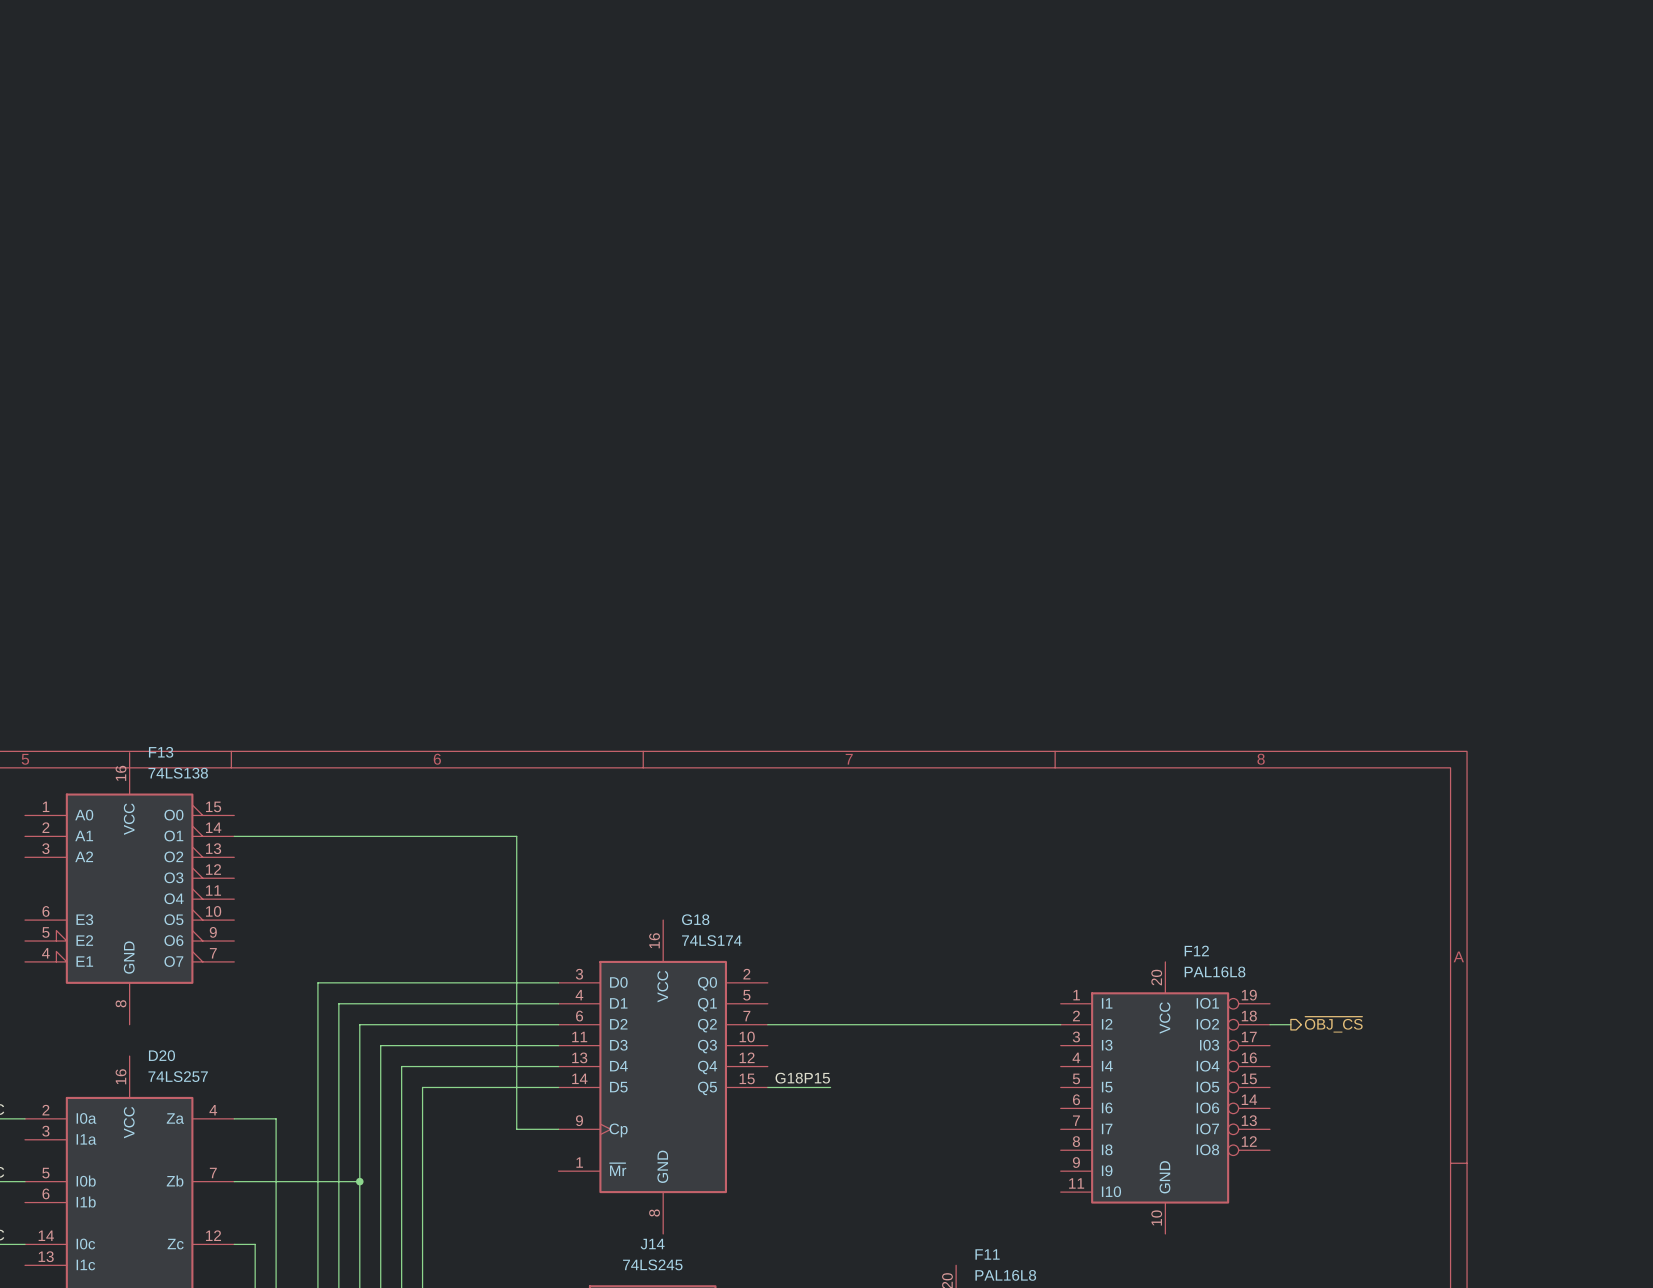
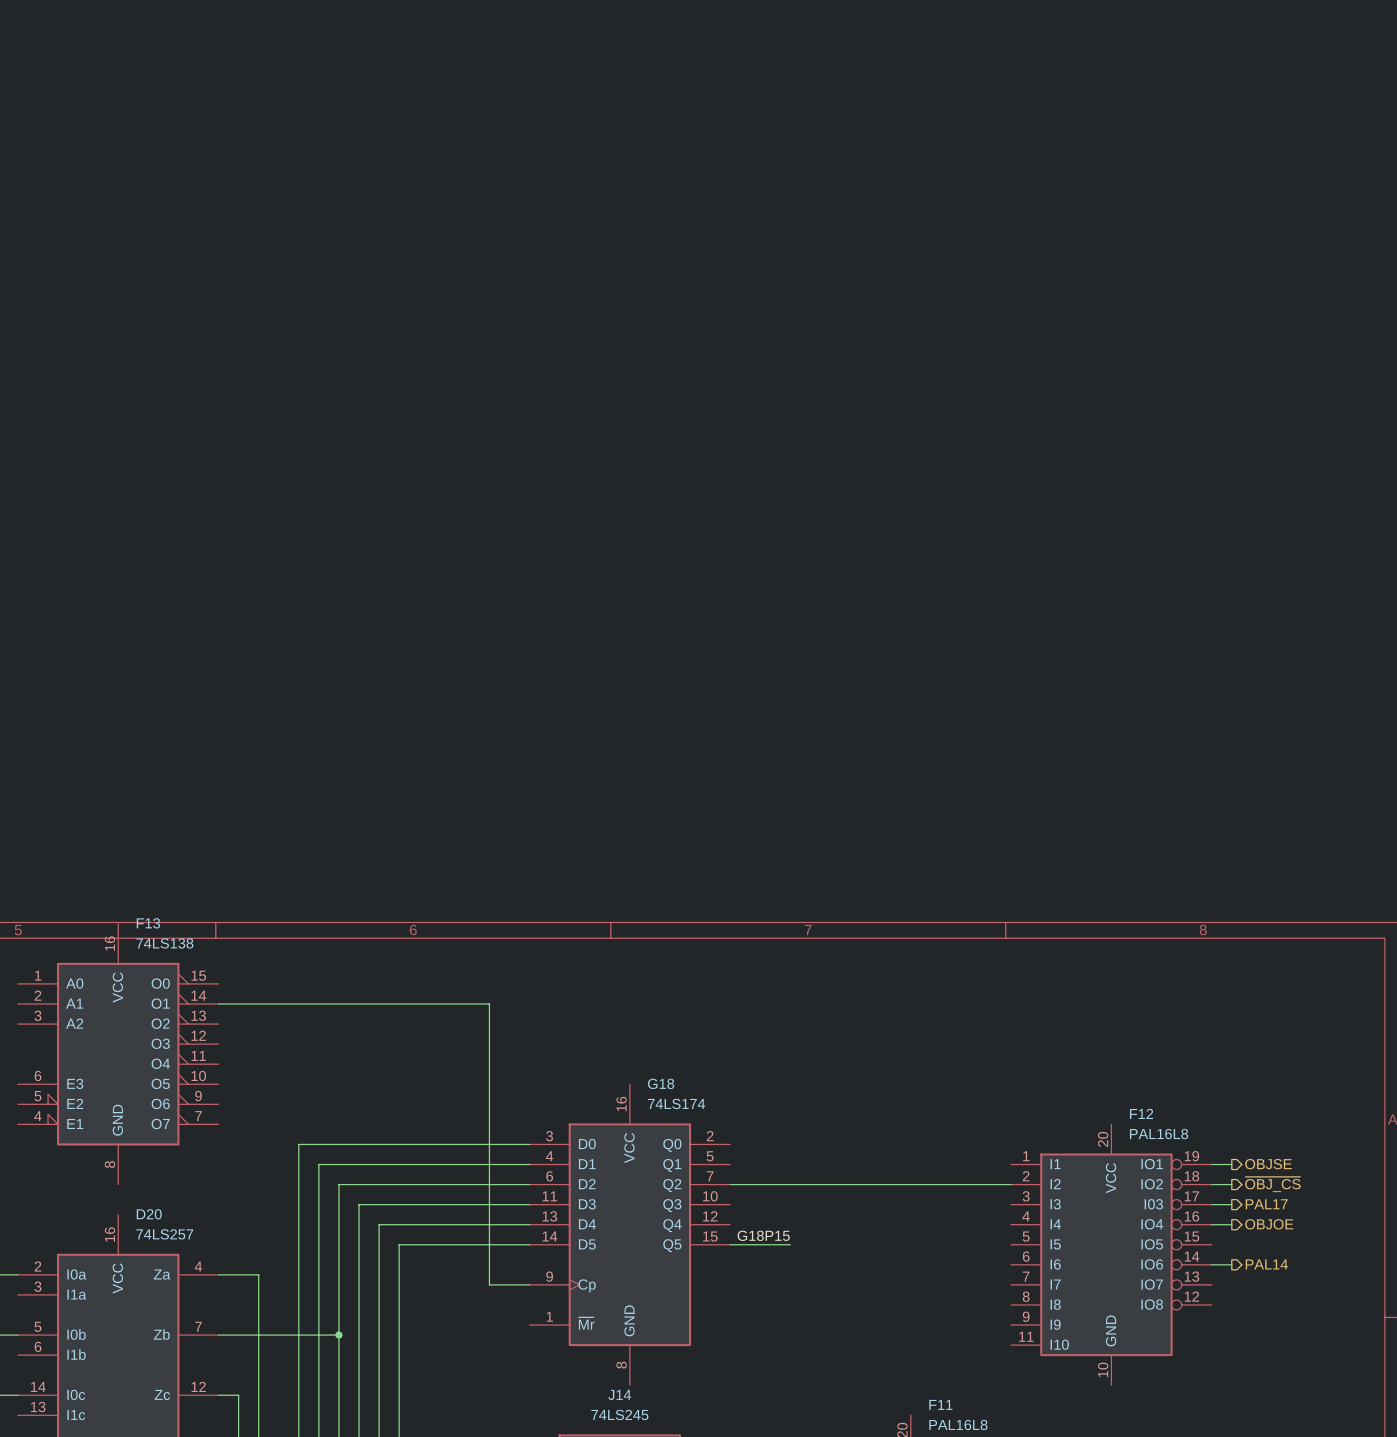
wire: none -> (1211, 1164) (1231, 1164)
hierarchical label: none -> OBJSE (1268, 1164)
wire: none -> (1211, 1204) (1231, 1204)
hierarchical label: none -> PAL17 (1266, 1204)
wire: none -> (1211, 1224) (1231, 1224)
hierarchical label: none -> OBJOE (1269, 1224)
wire: none -> (1211, 1264) (1231, 1264)
hierarchical label: none -> PAL14 (1266, 1264)

